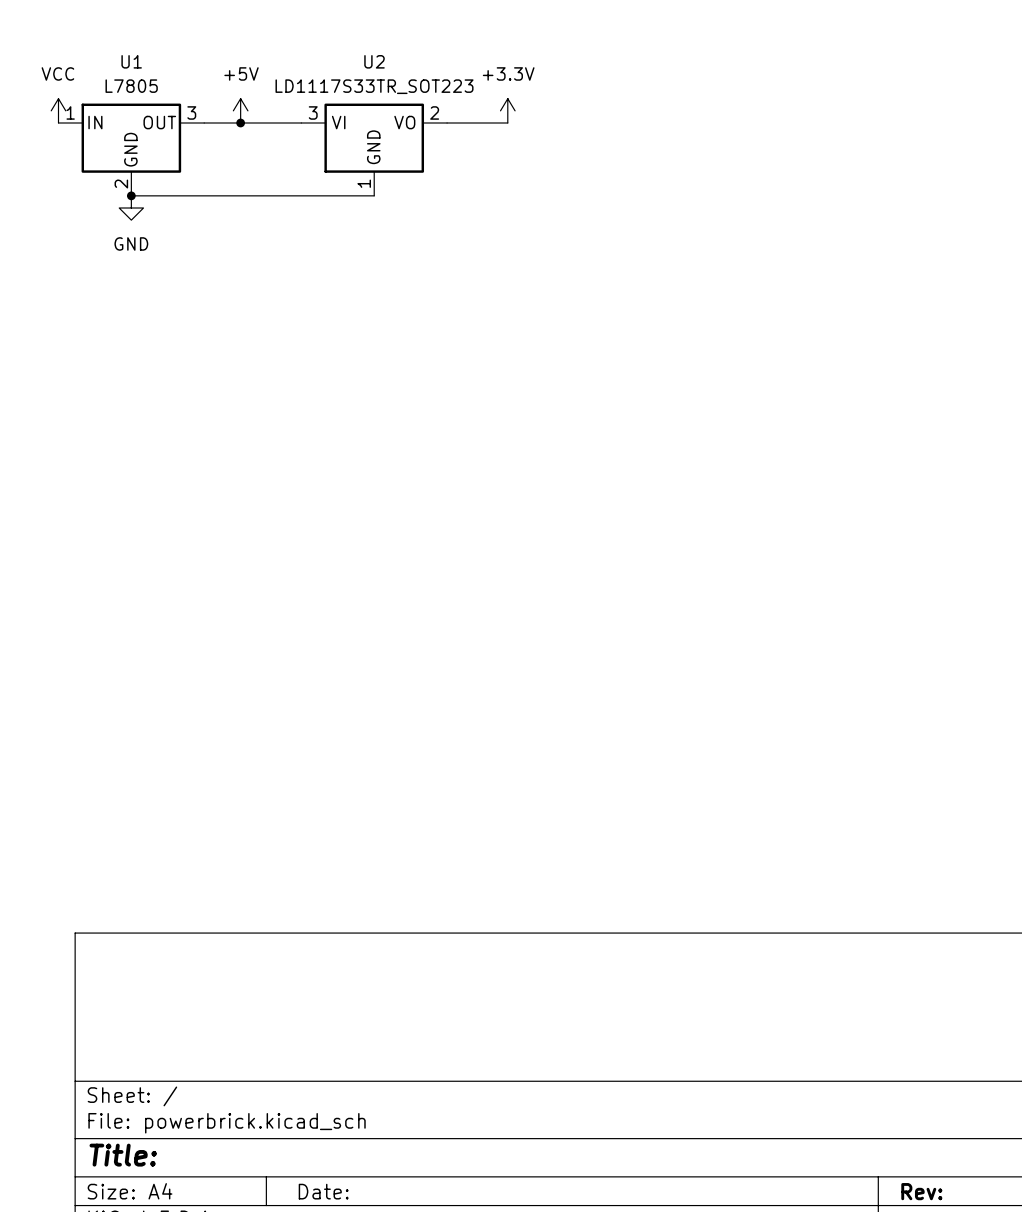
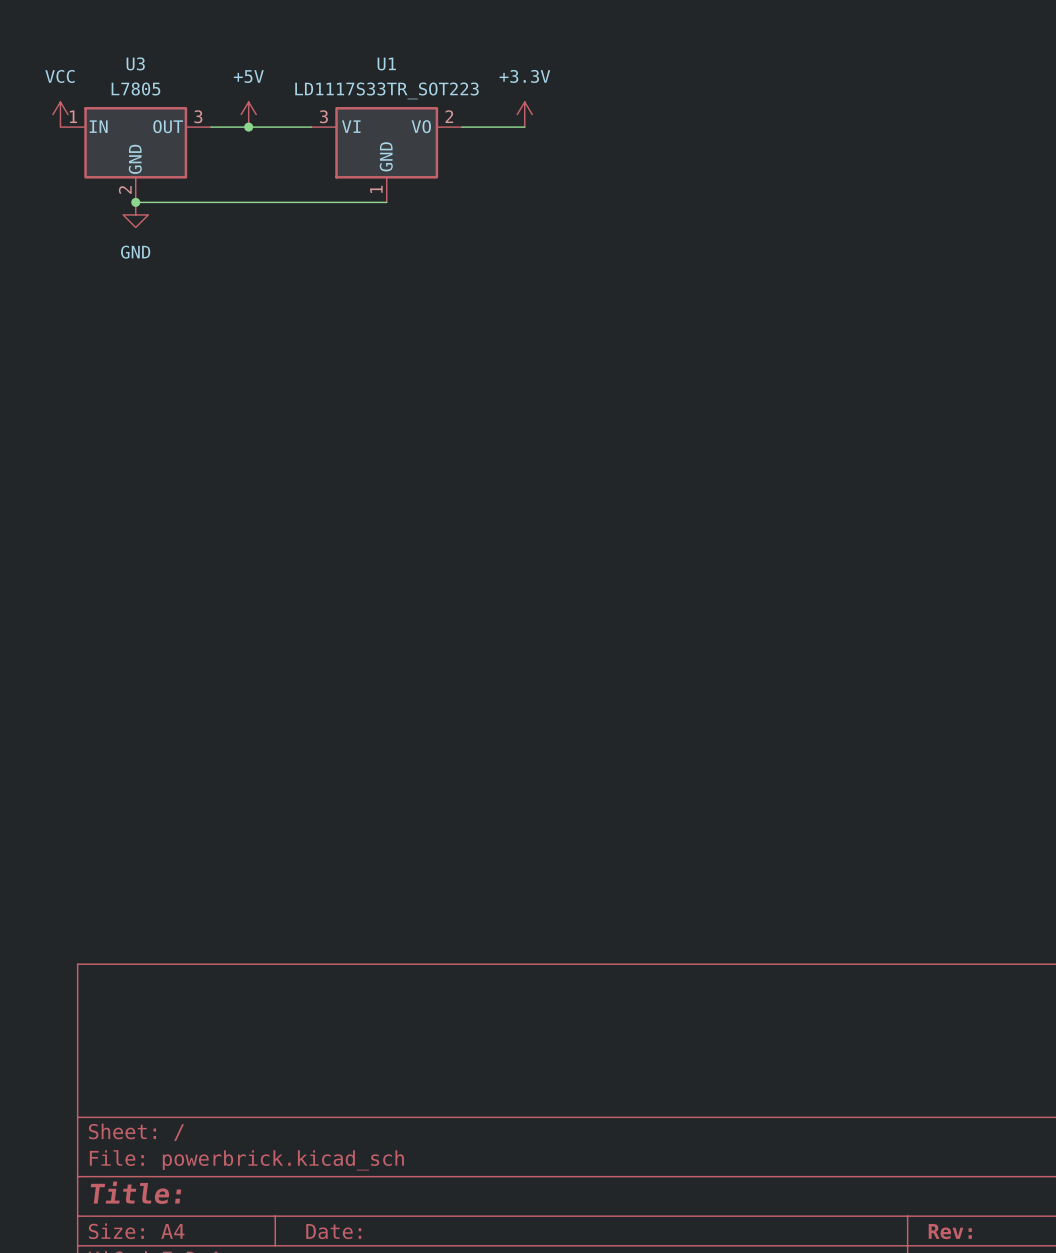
U1 name: U1 (131, 61) -> U3 (135, 63)
U2 name: U2 (374, 61) -> U1 (386, 64)

